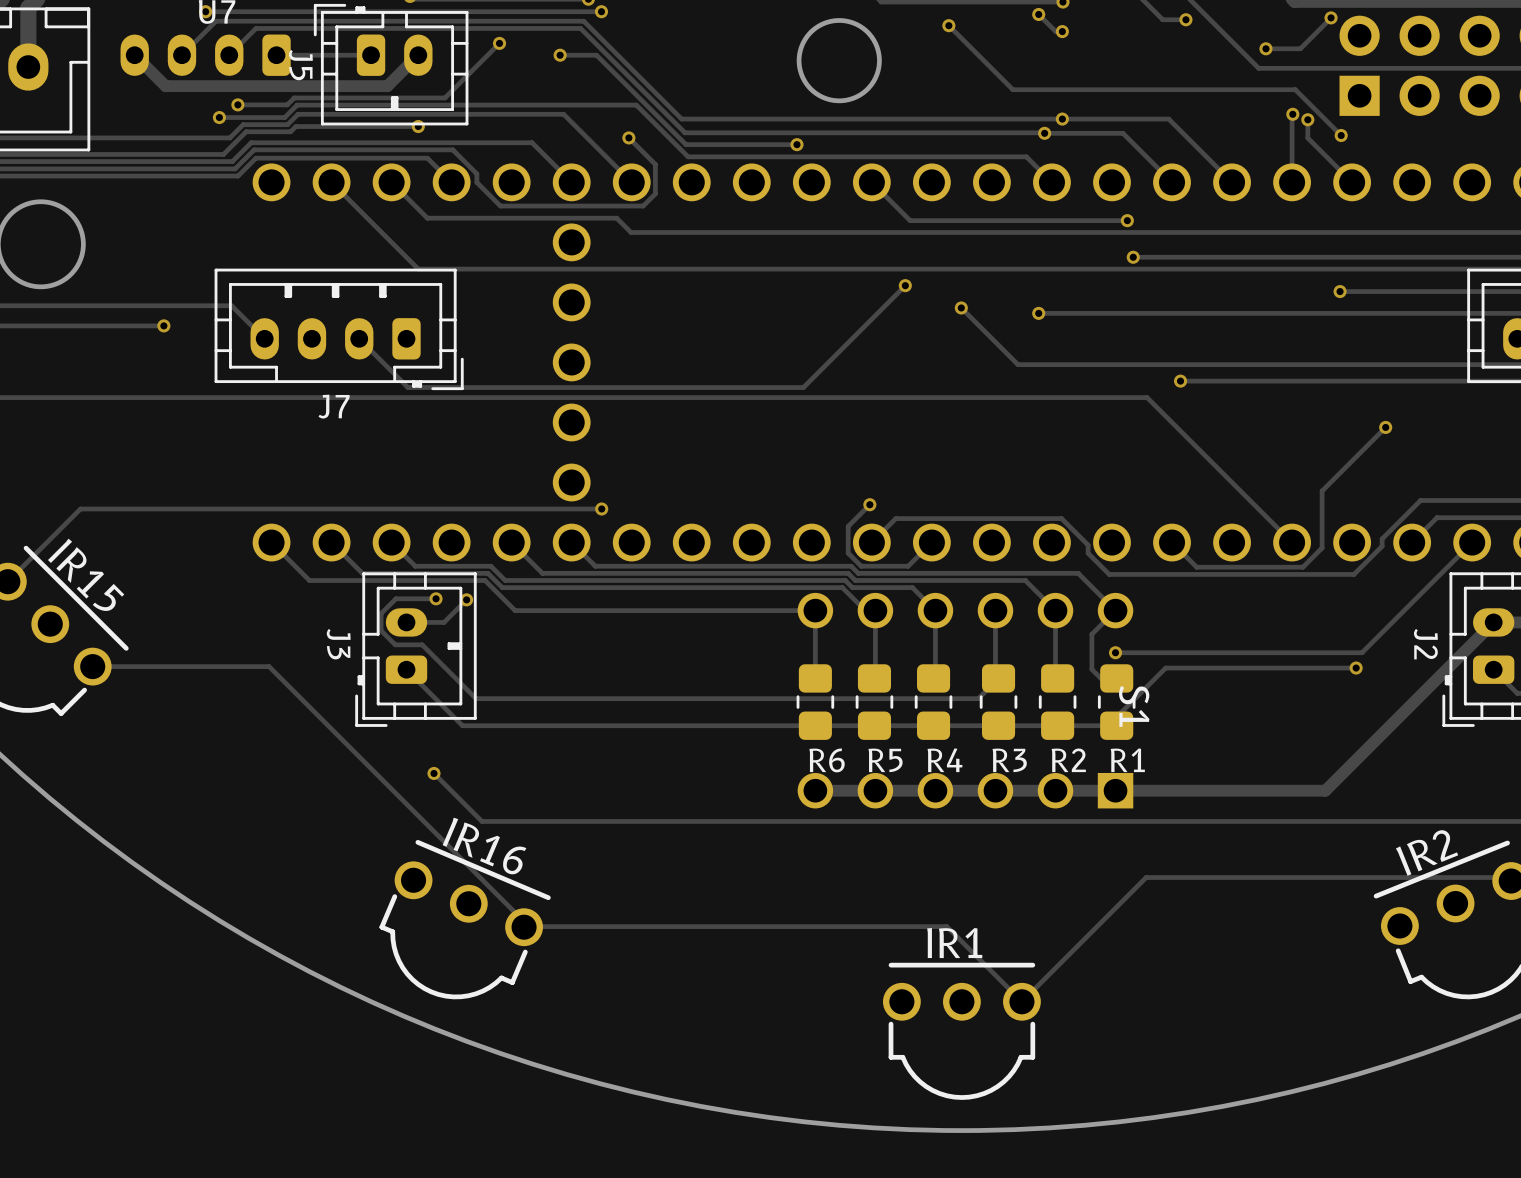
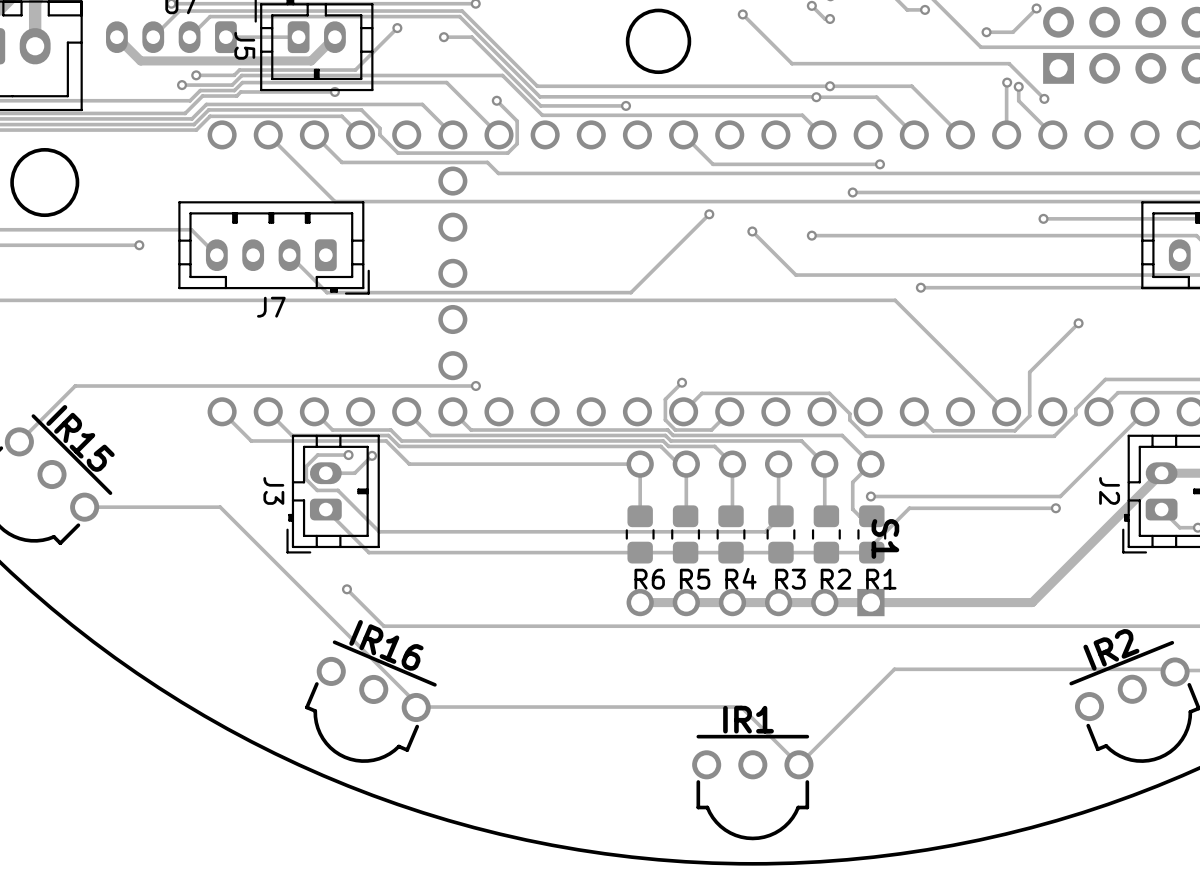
track: none -> (884, 192) (852, 192)
via position: (1133, 257) -> (852, 192)

